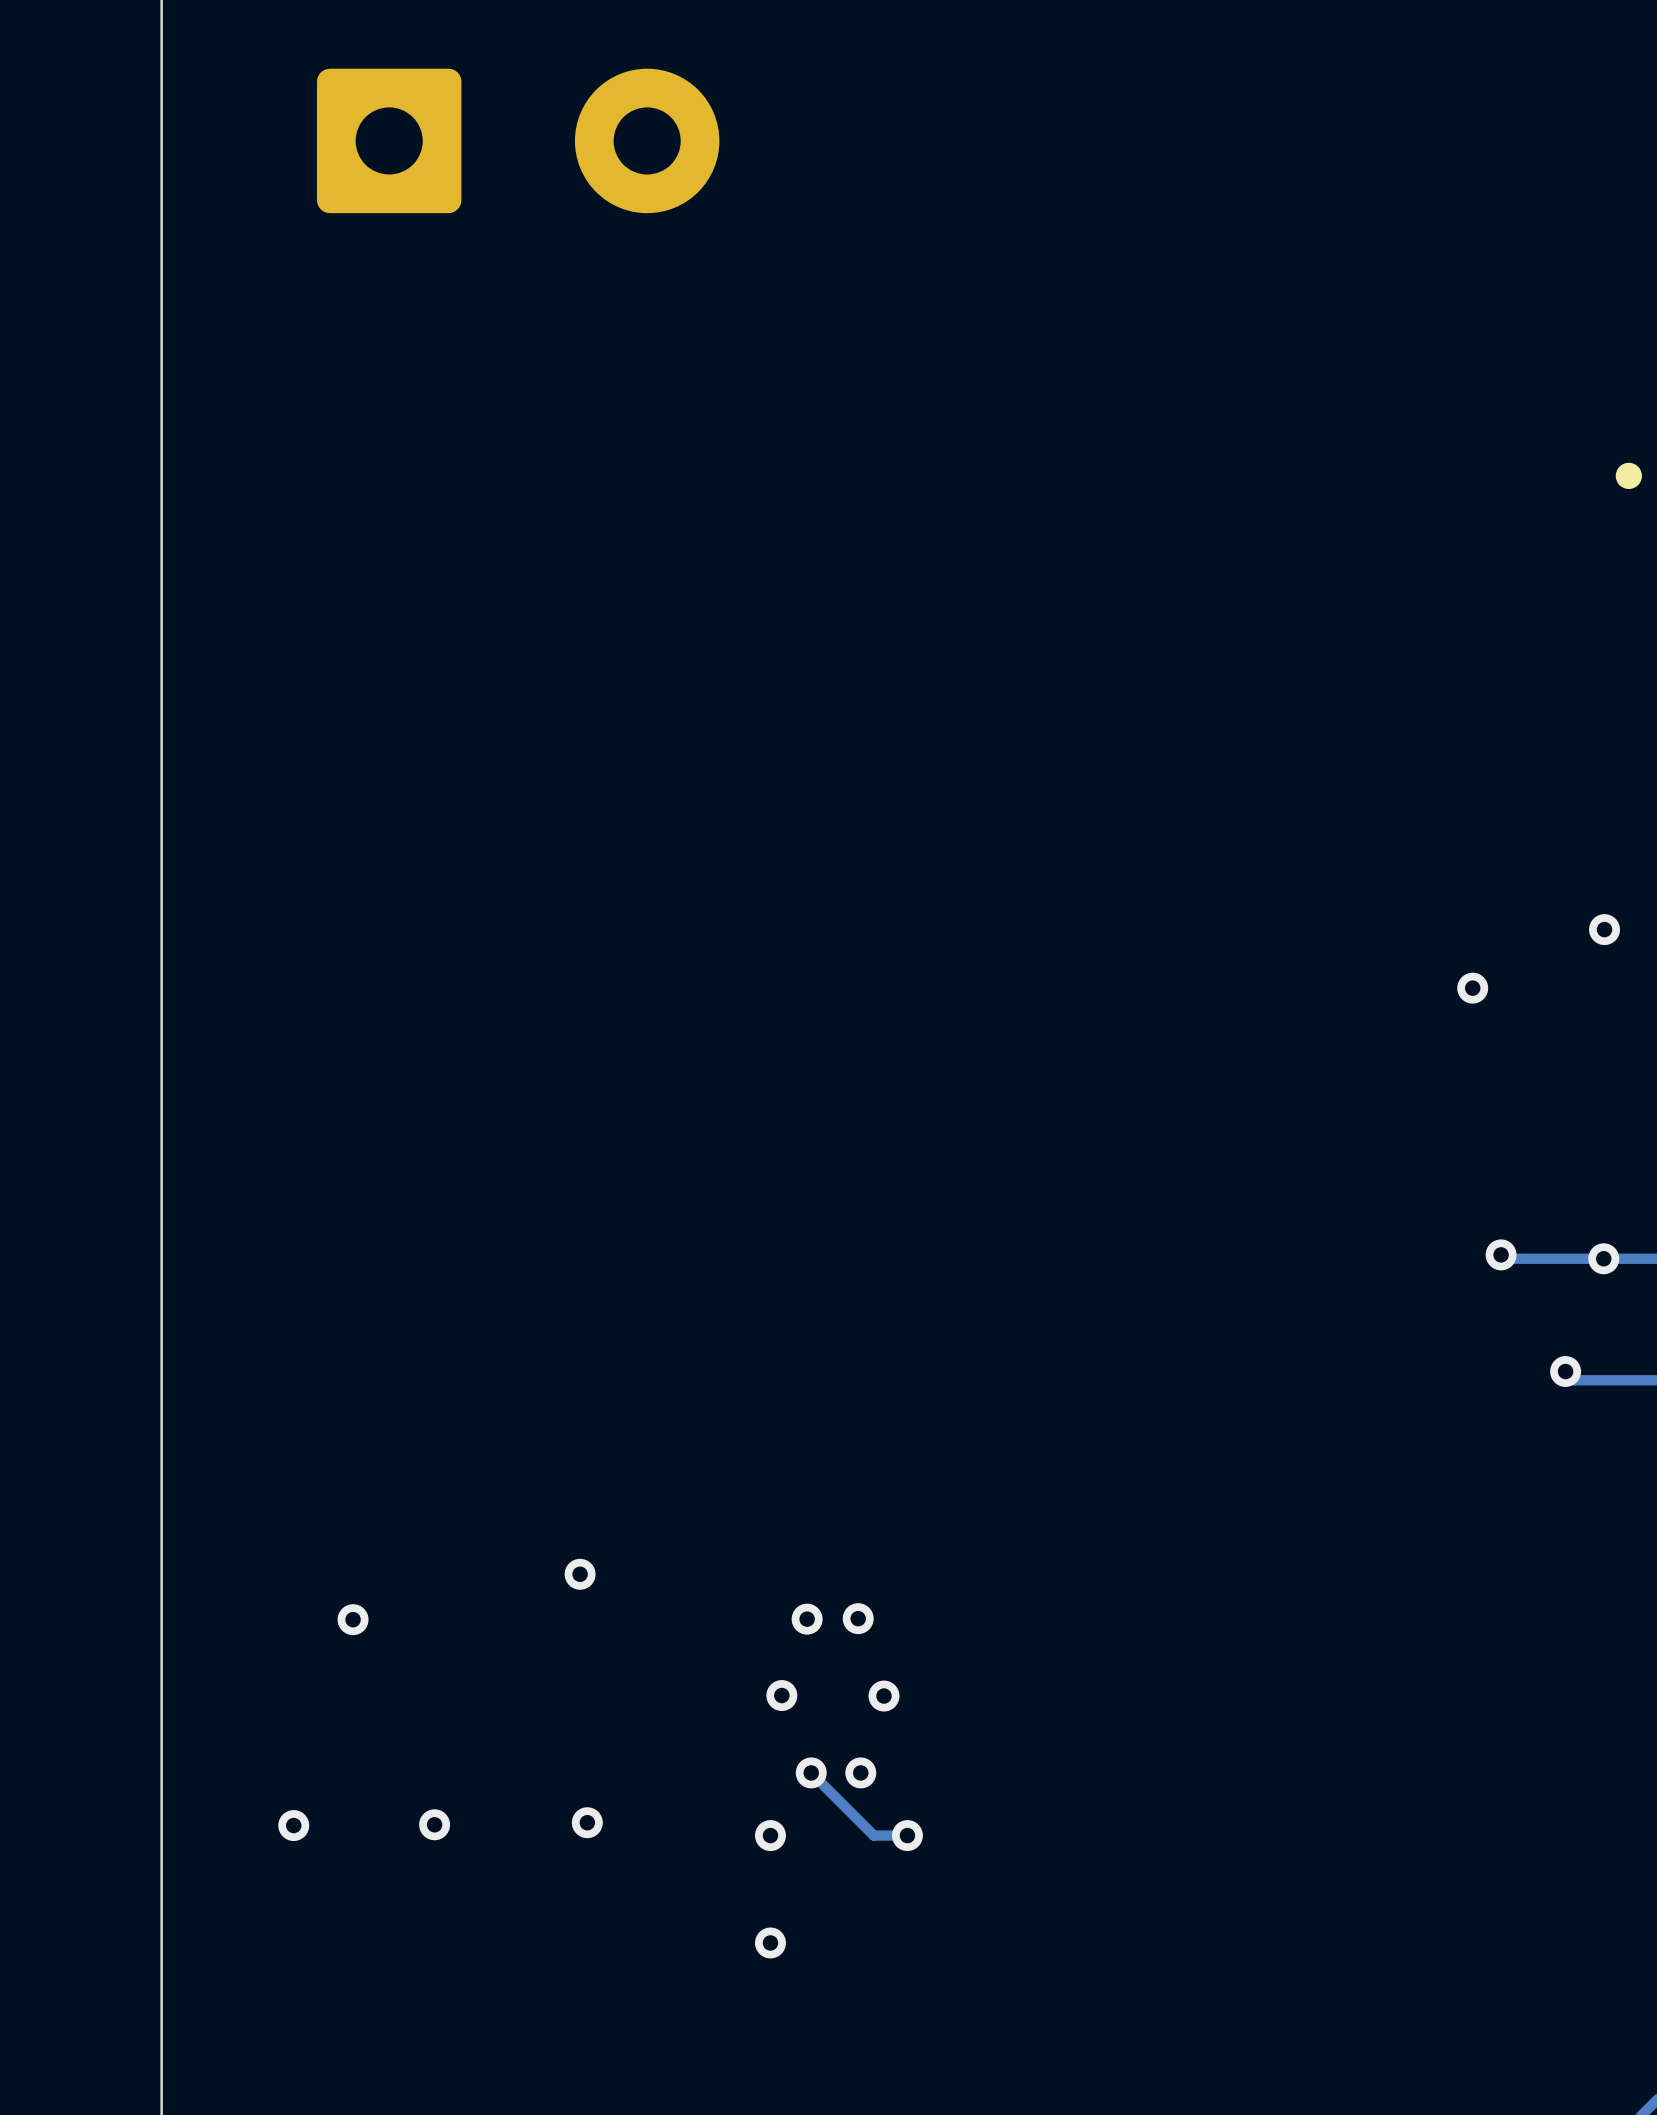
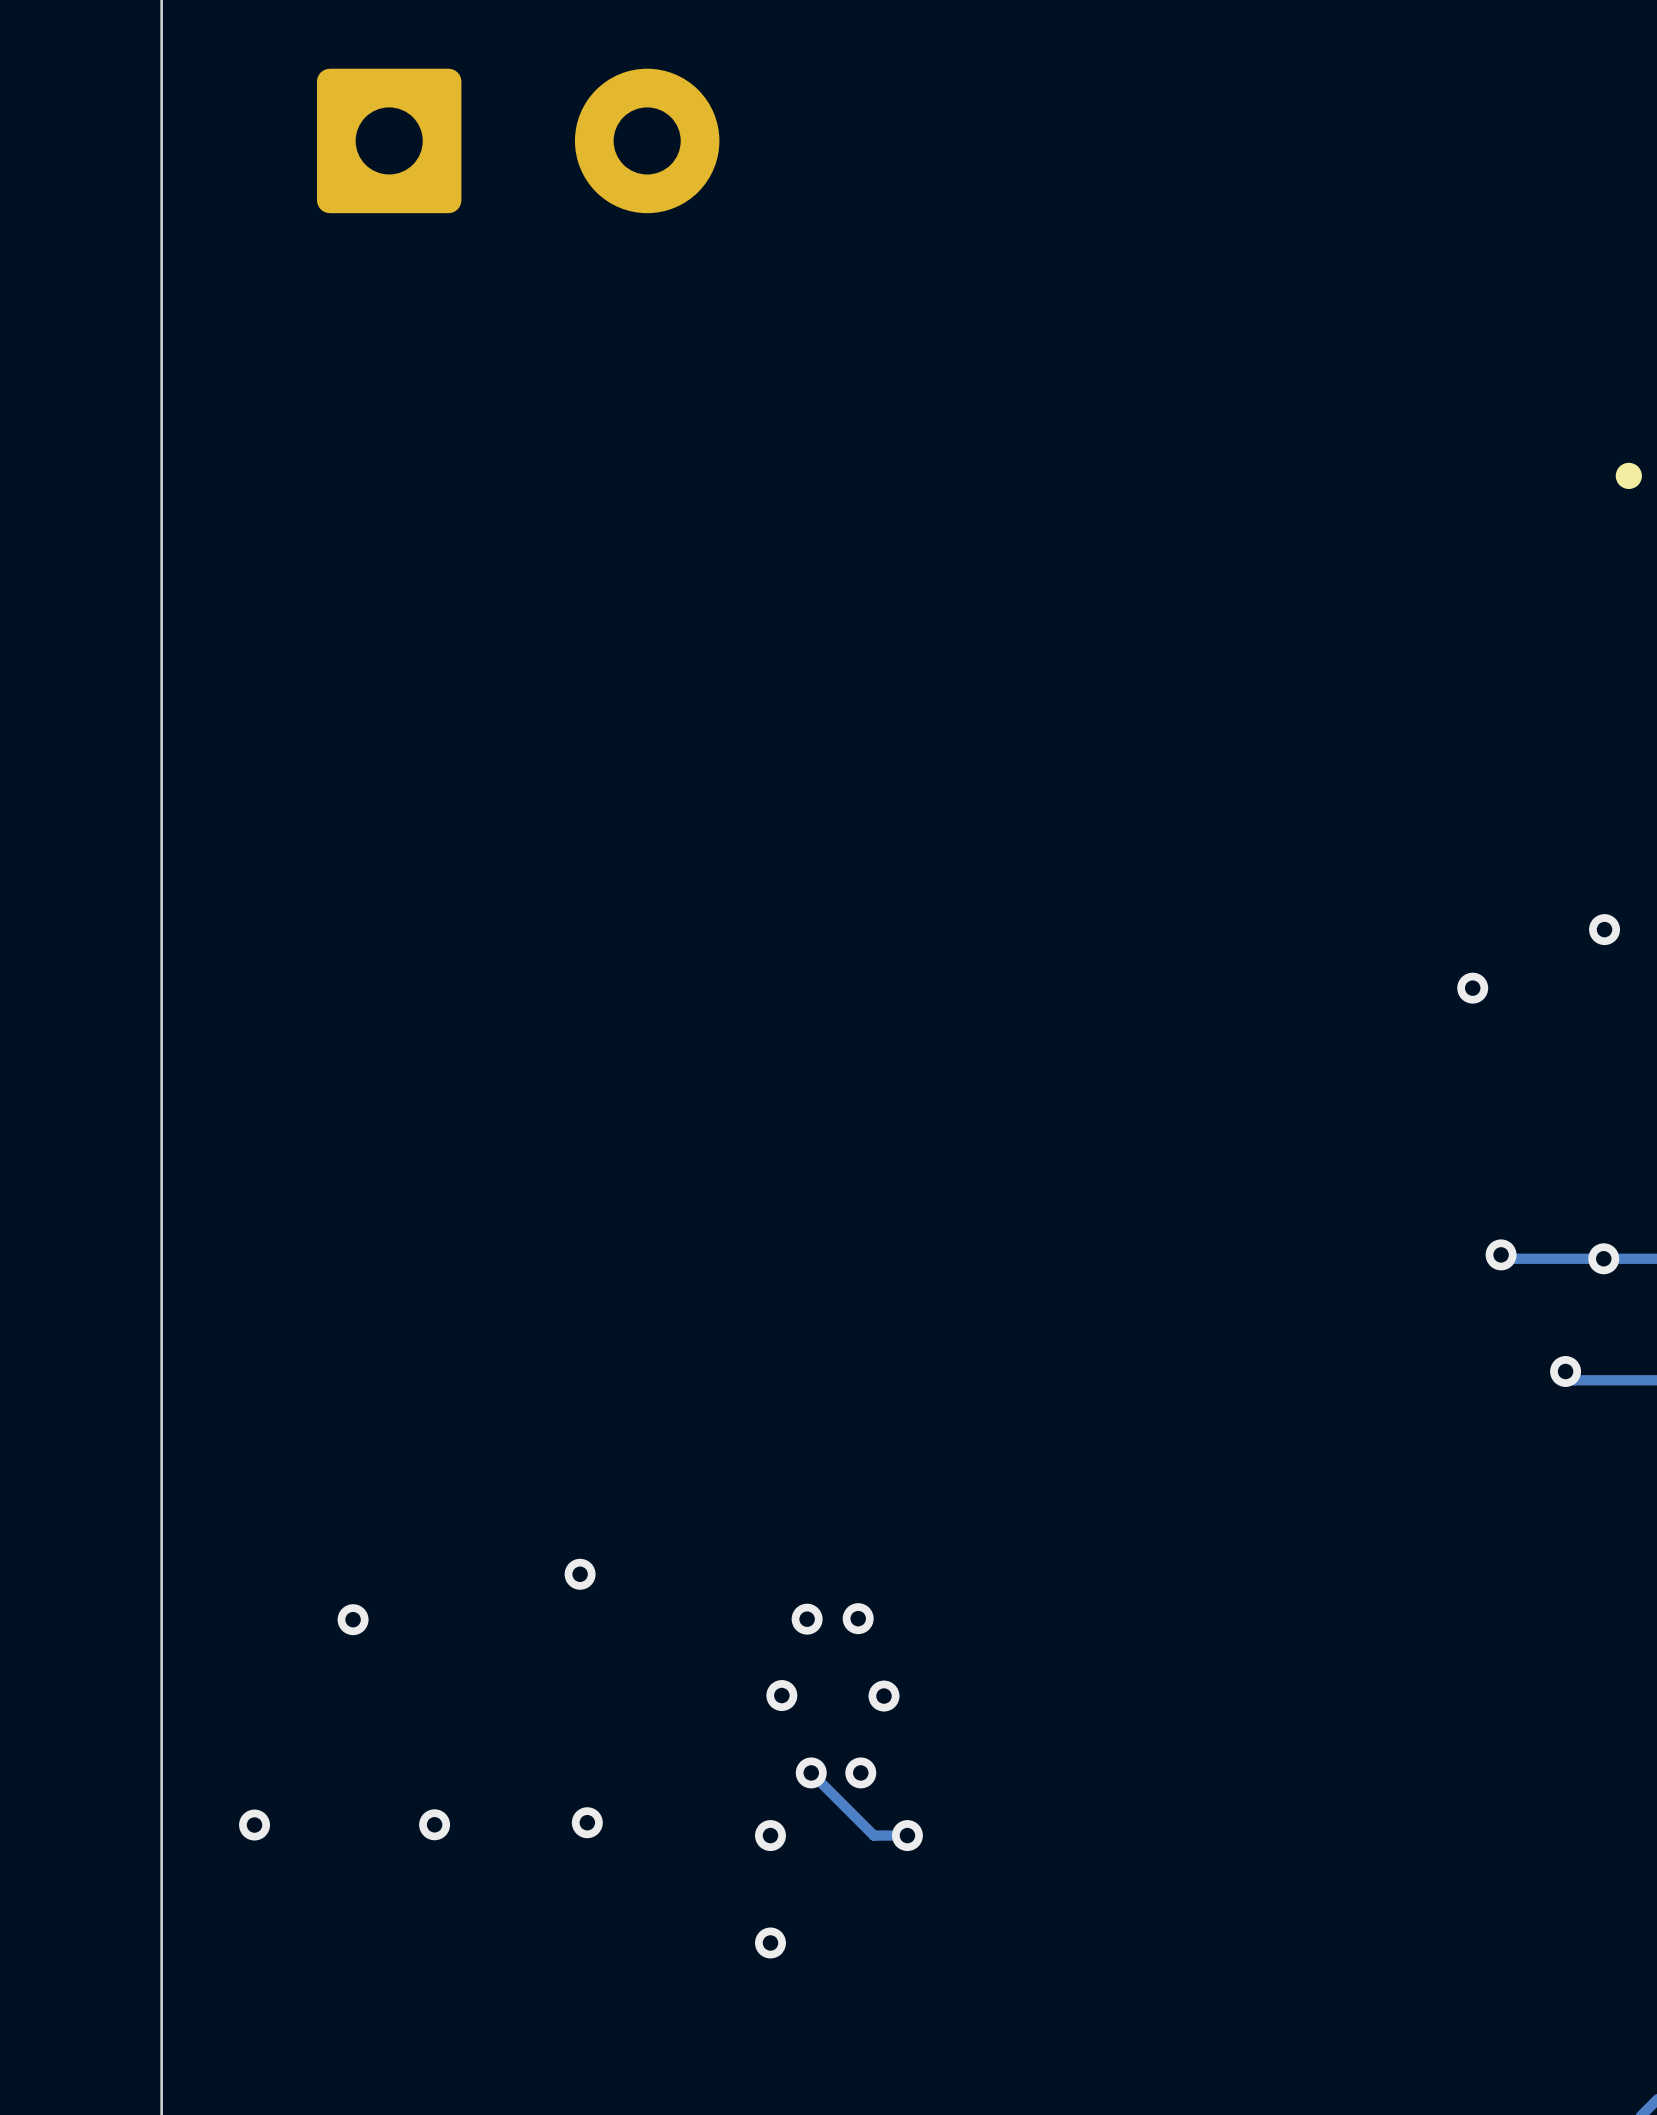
via position: (293, 1825) -> (254, 1825)

